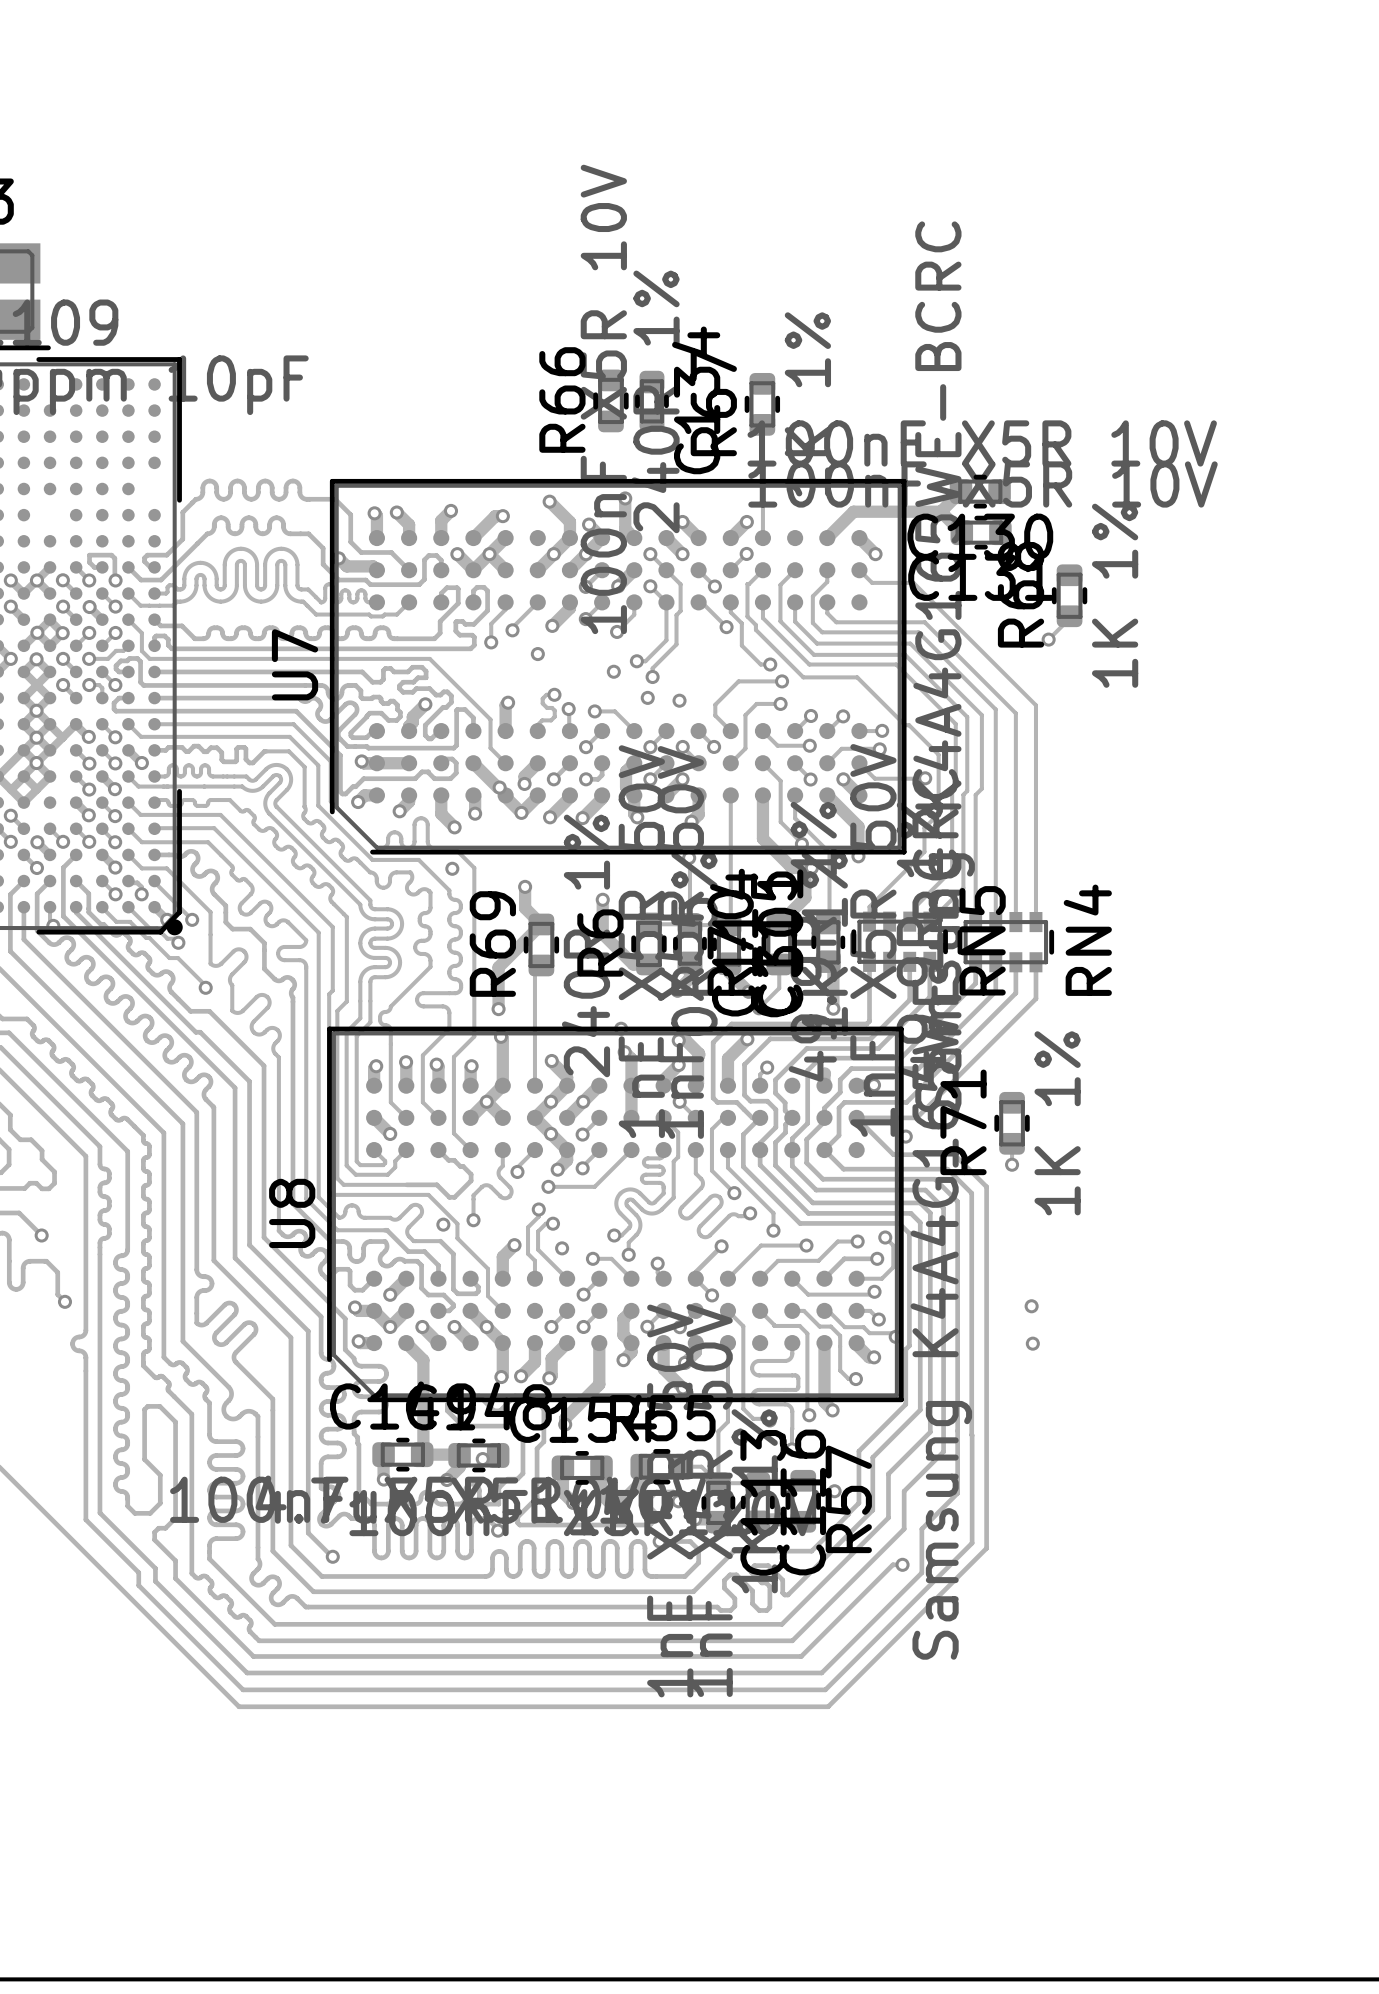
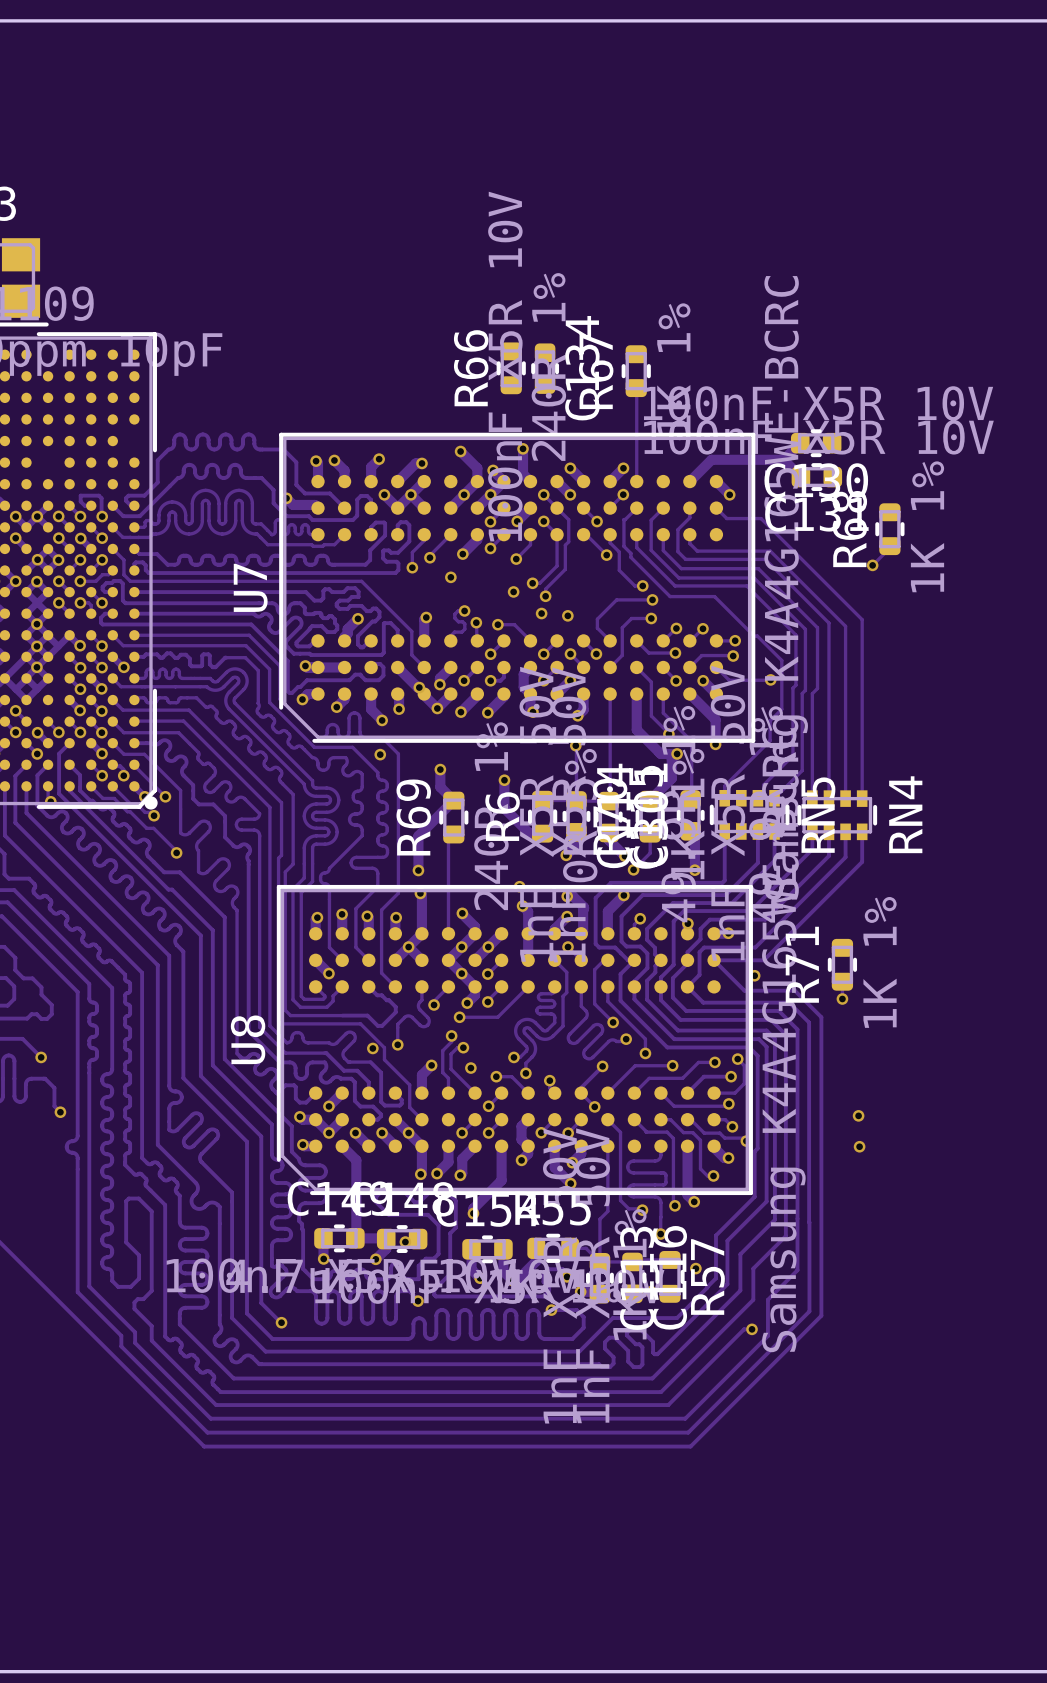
via: none -> (687, 923)

